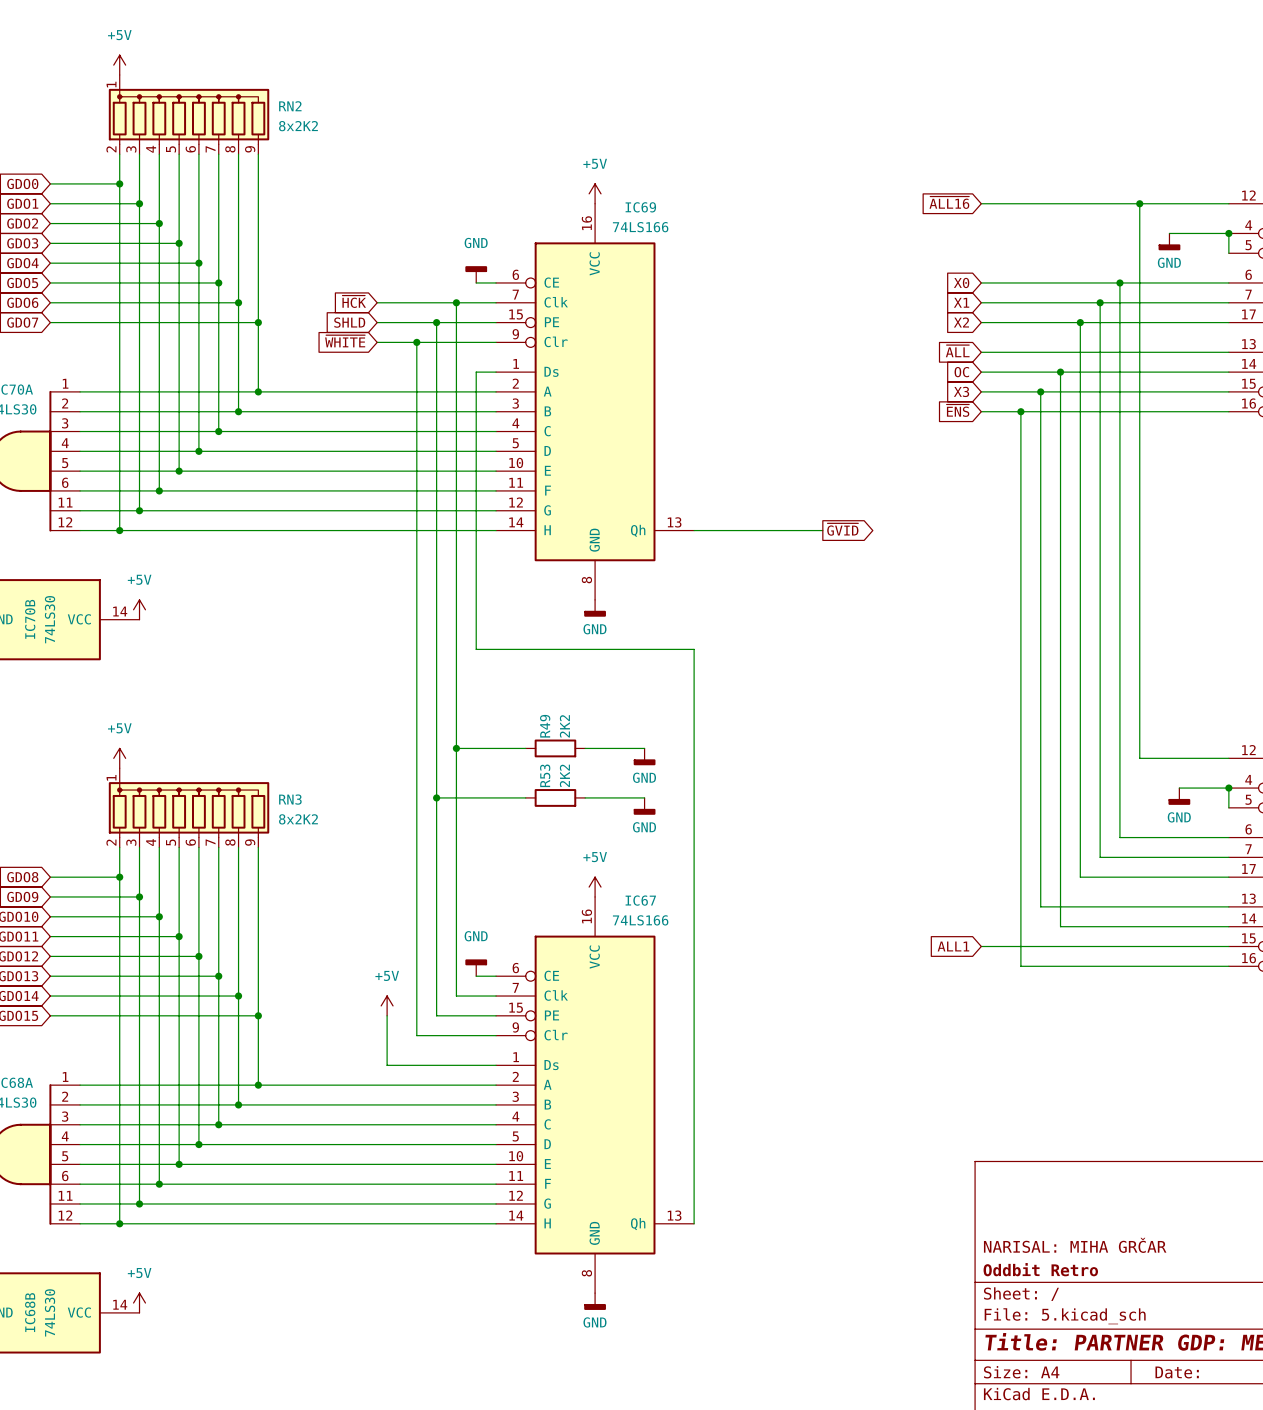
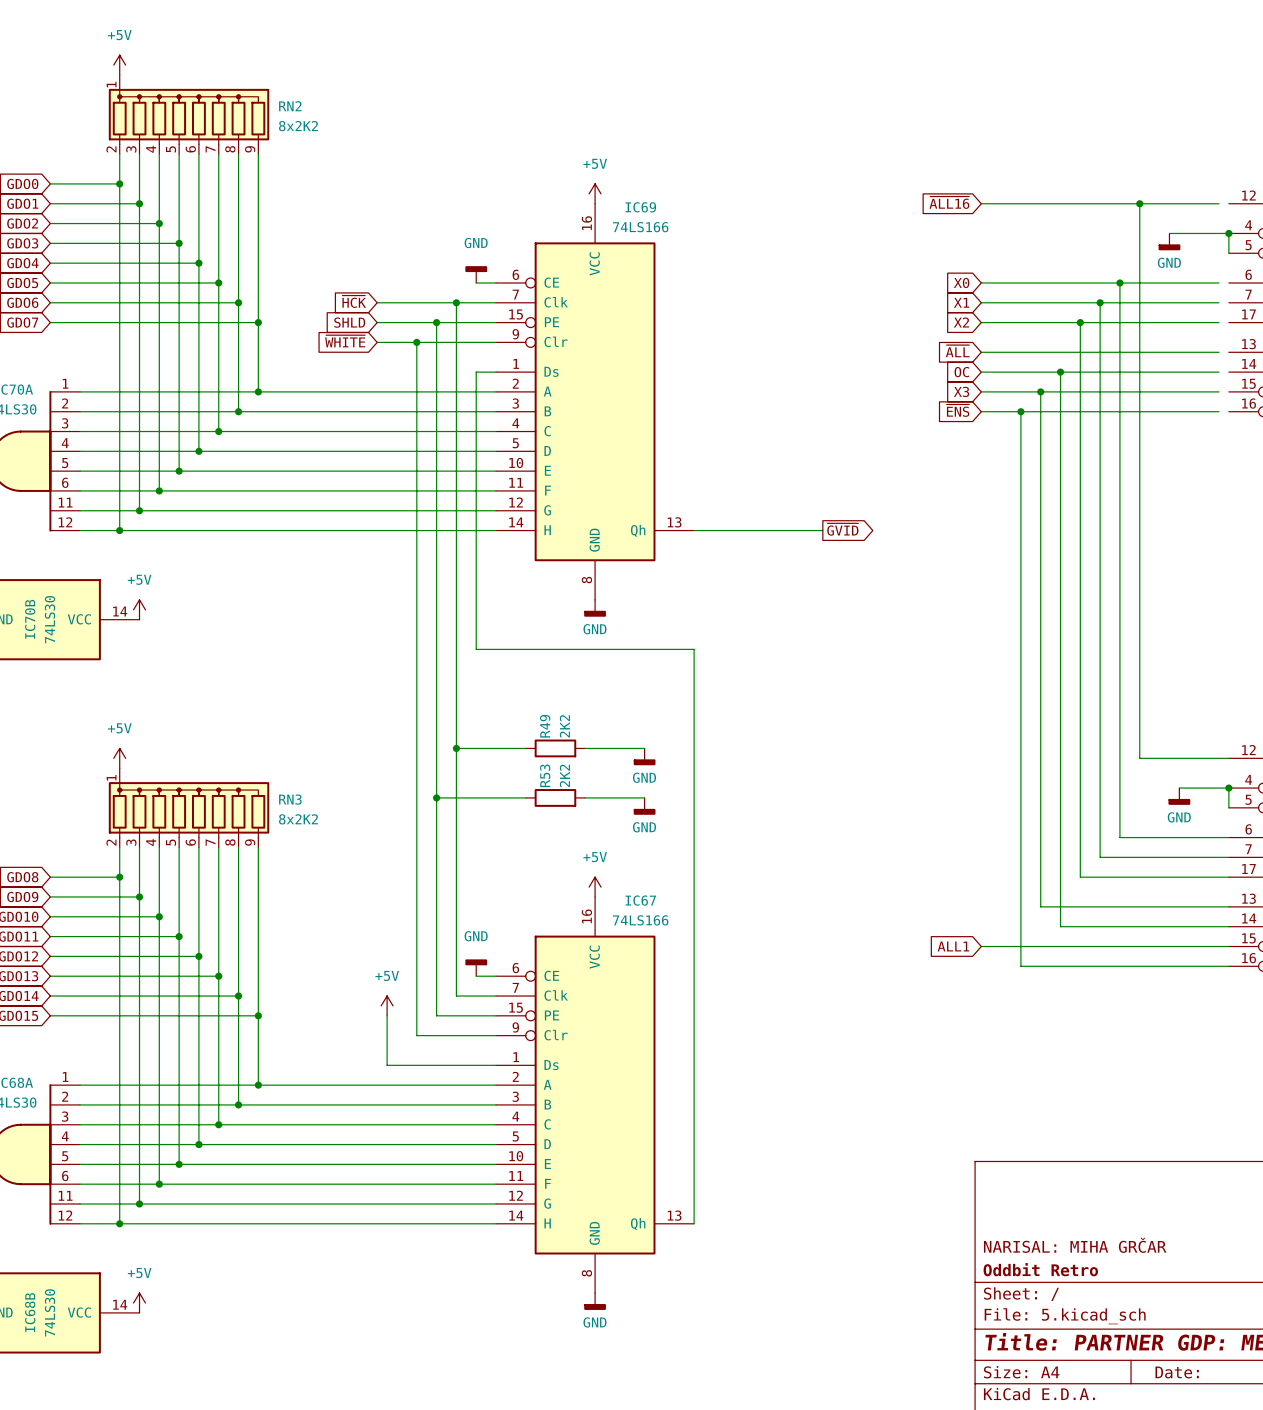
wire: (1218, 203) (1228, 203) -> none
wire: (1218, 282) (1228, 282) -> none
wire: (1218, 302) (1228, 302) -> none
wire: (1218, 322) (1228, 322) -> none
wire: (1218, 352) (1228, 352) -> none
wire: (1218, 372) (1228, 372) -> none
wire: (1218, 391) (1228, 391) -> none
wire: (1218, 411) (1228, 411) -> none

